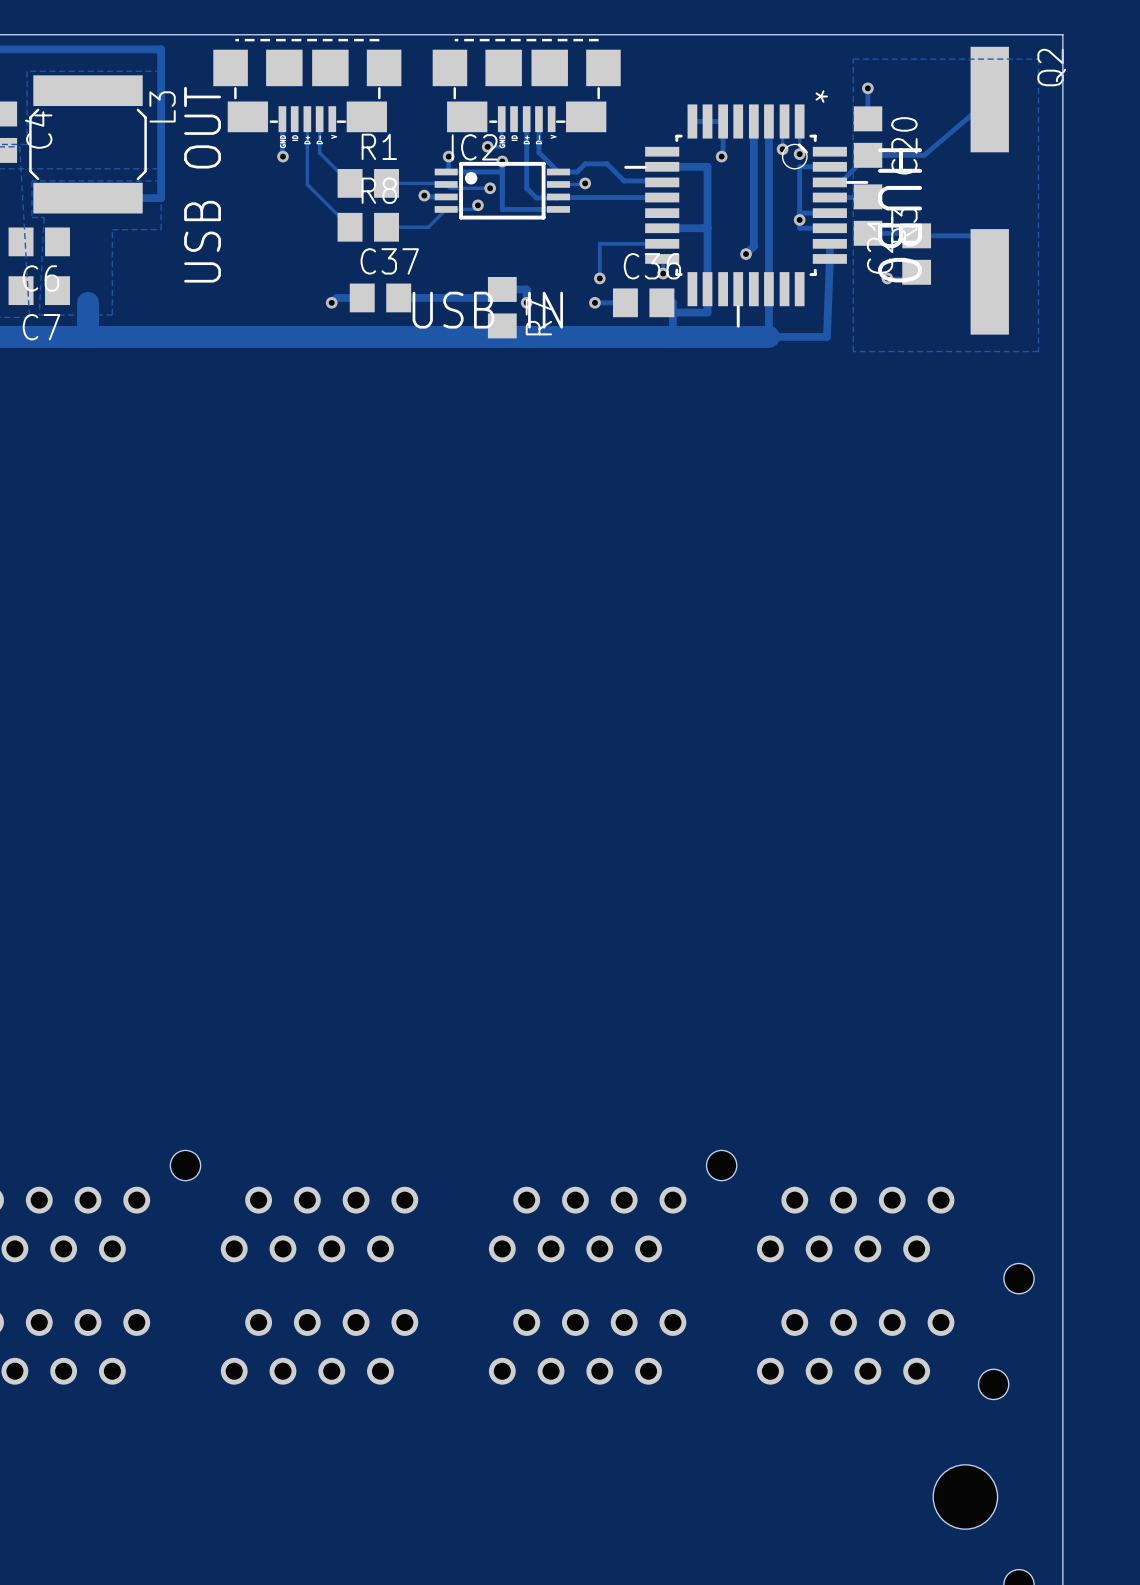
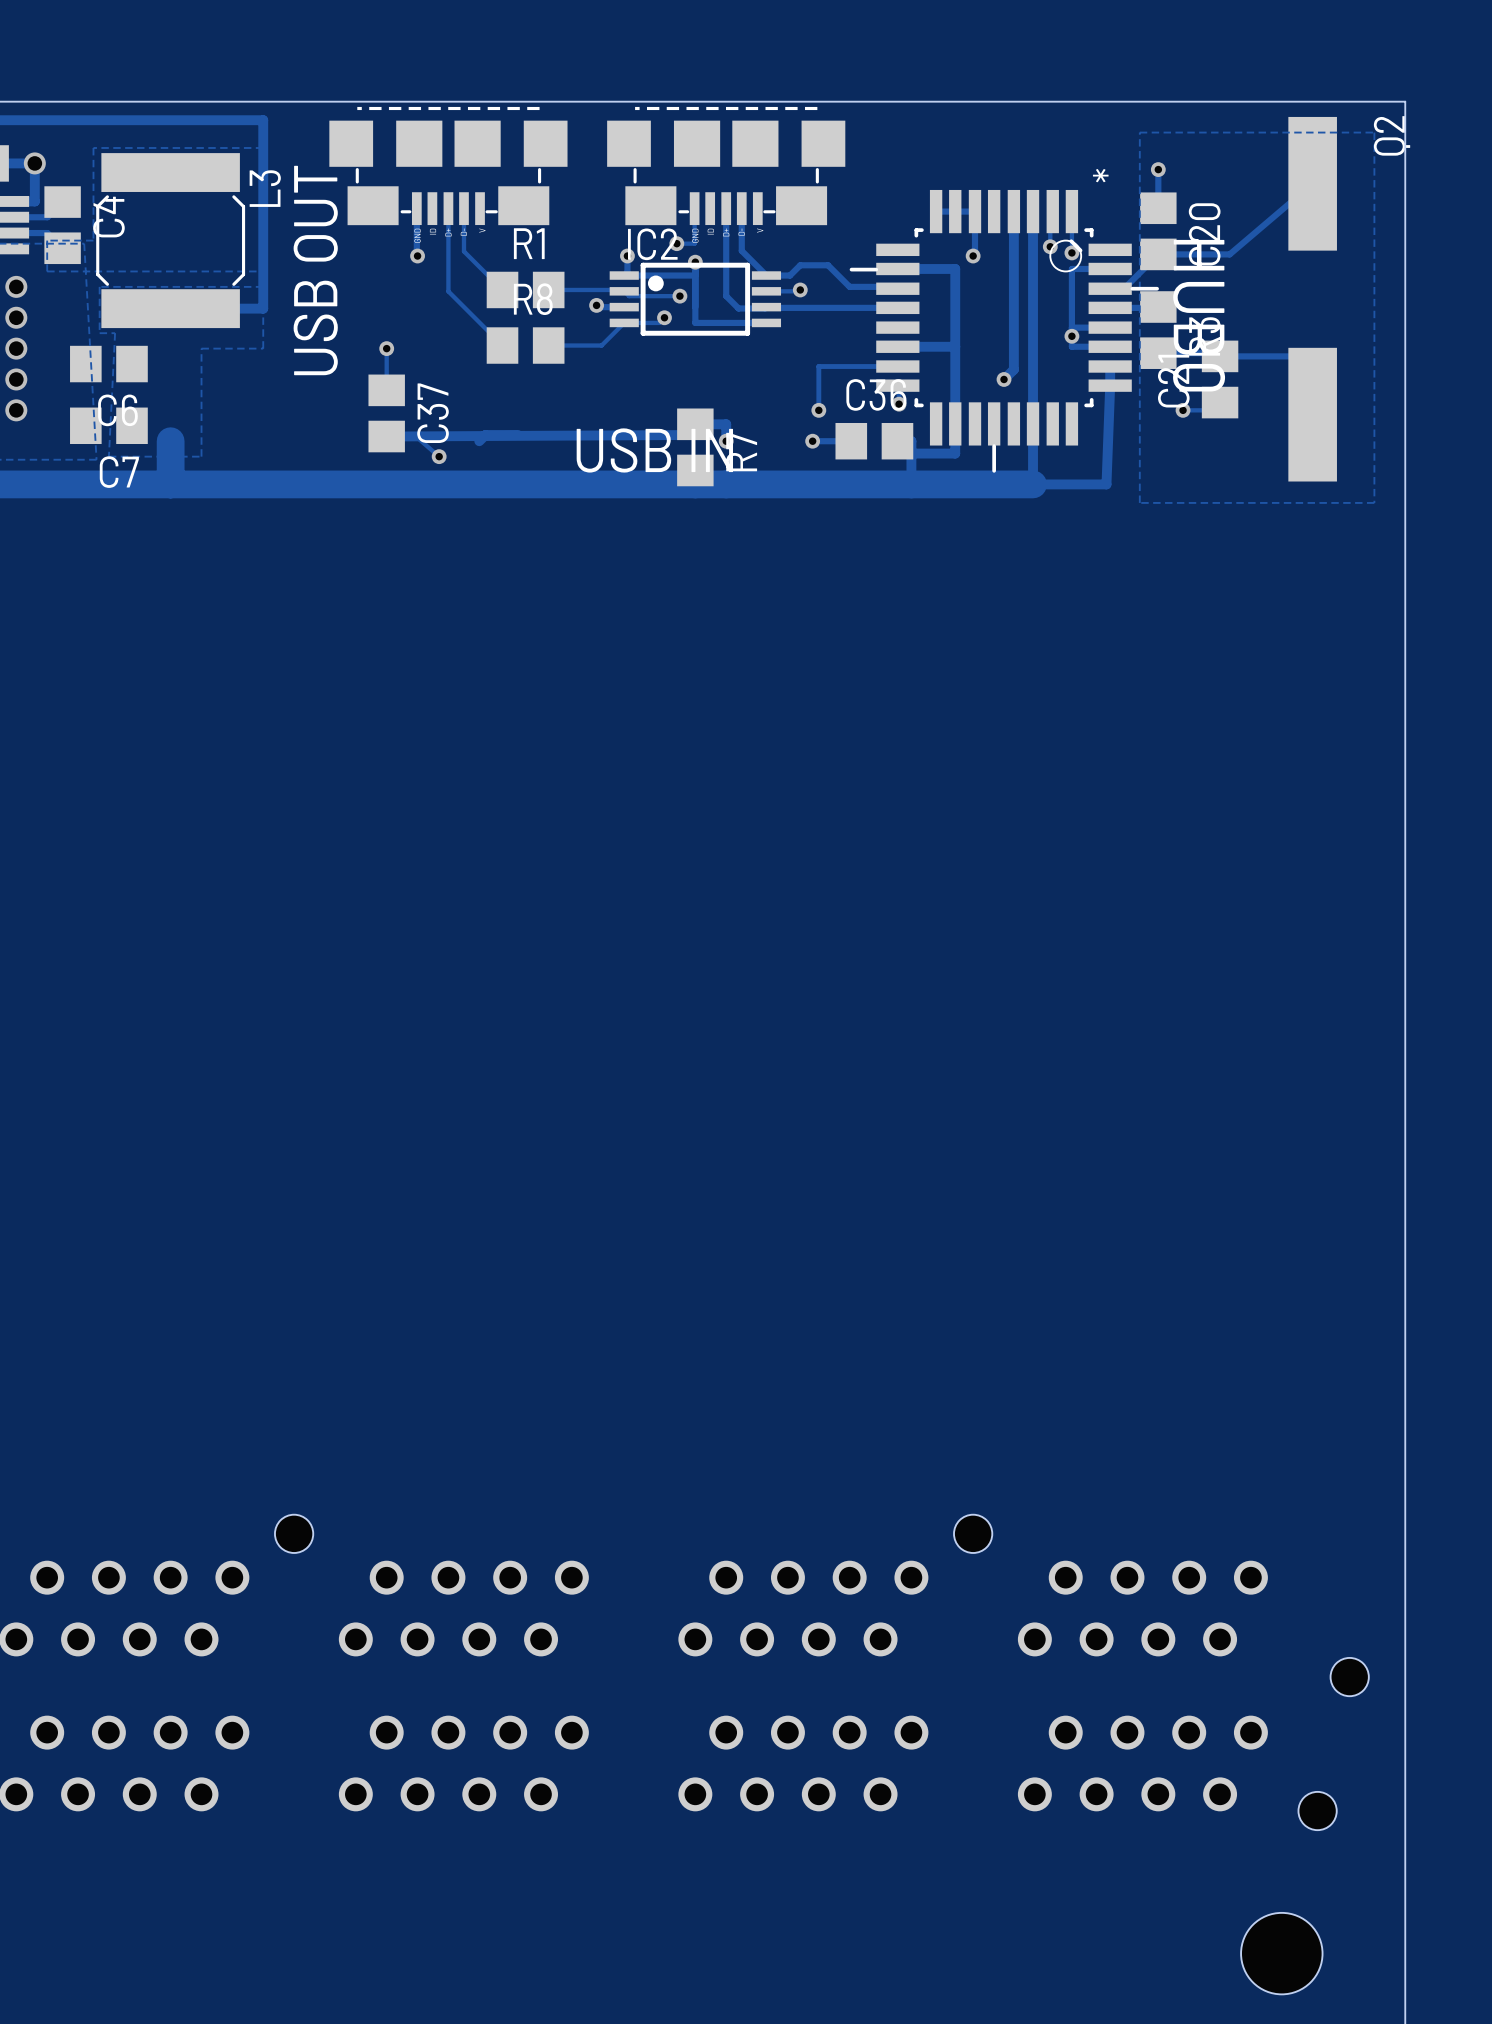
track: none -> (386, 348) (386, 390)
via: none -> (386, 348)
C37 rotation: 0° (380, 297) -> 90° clockwise (386, 413)
C37 position: (380, 297) -> (386, 413)
track: (398, 297) (493, 297) -> (439, 456) (415, 436) (386, 436) (684, 435)
via position: (331, 302) -> (439, 456)

